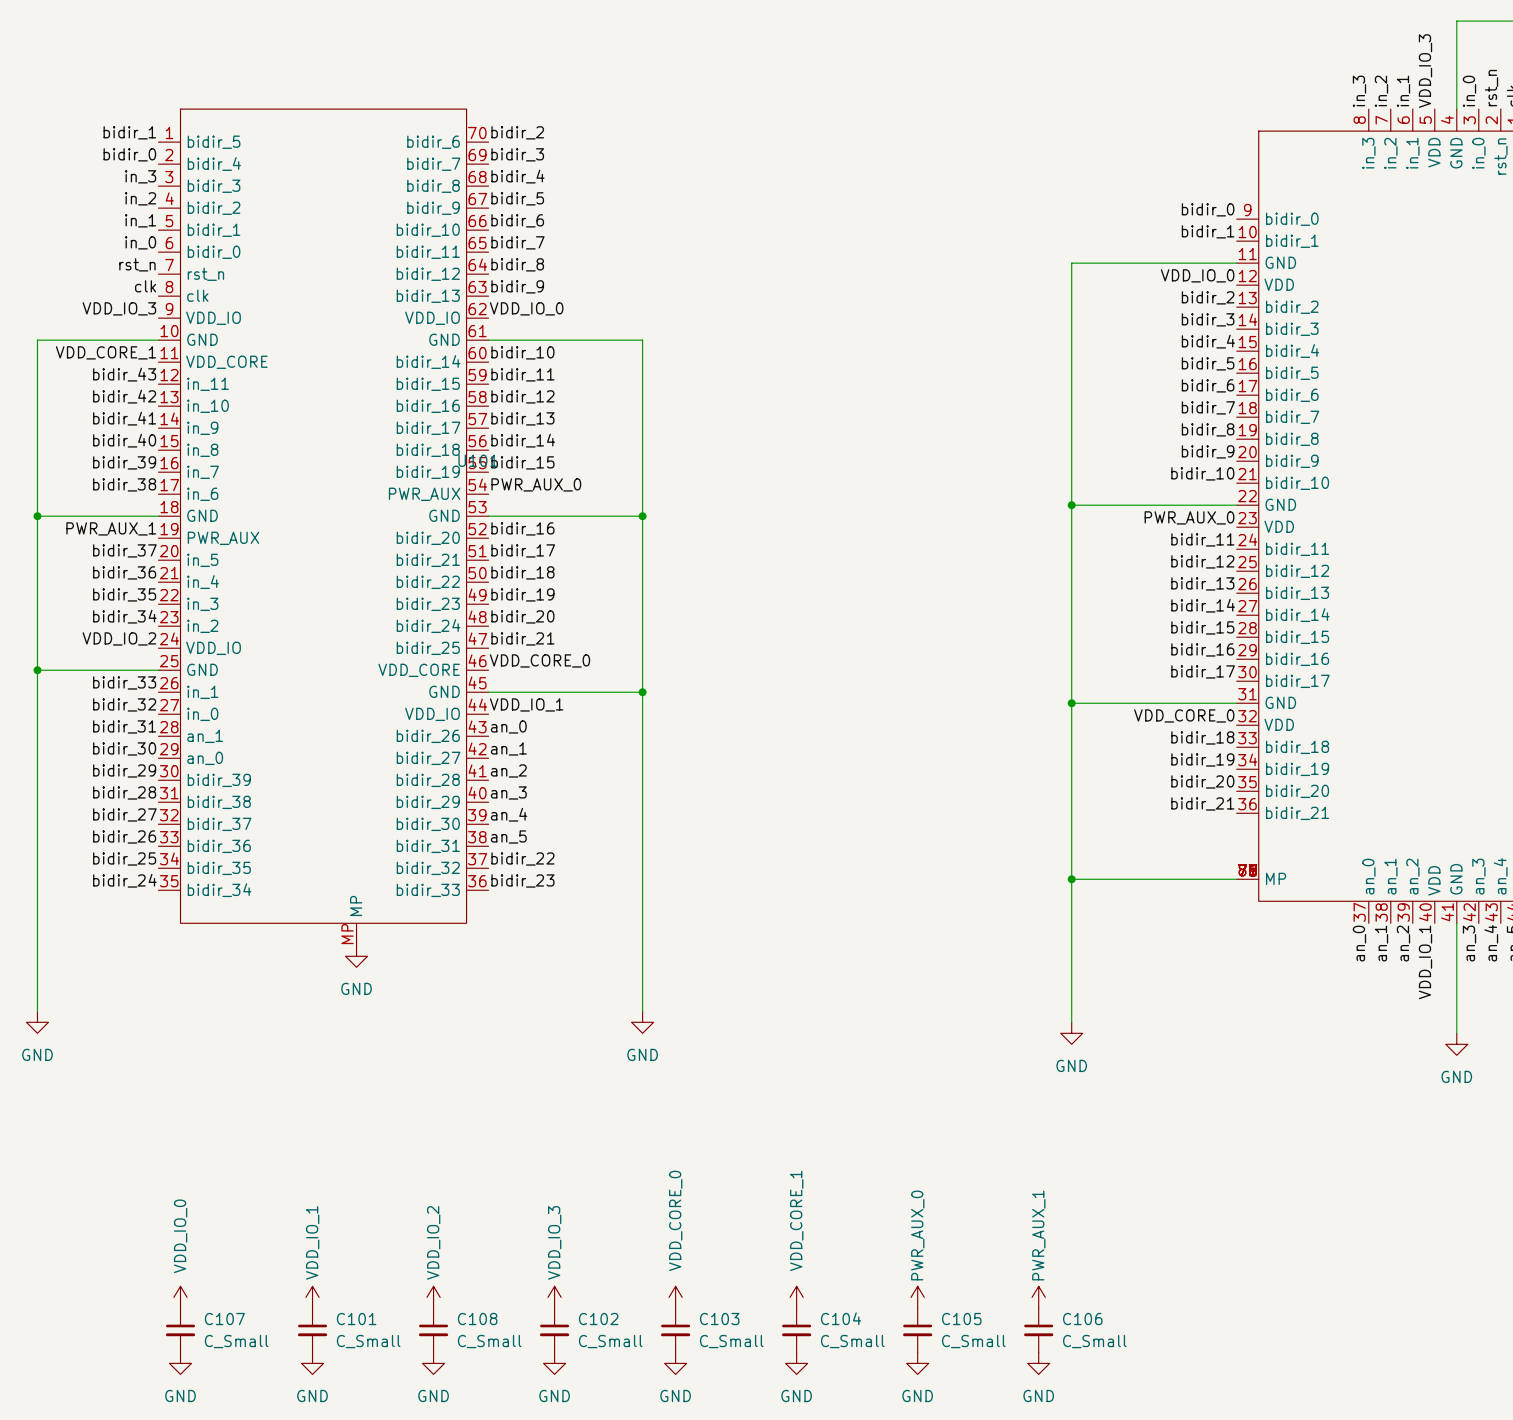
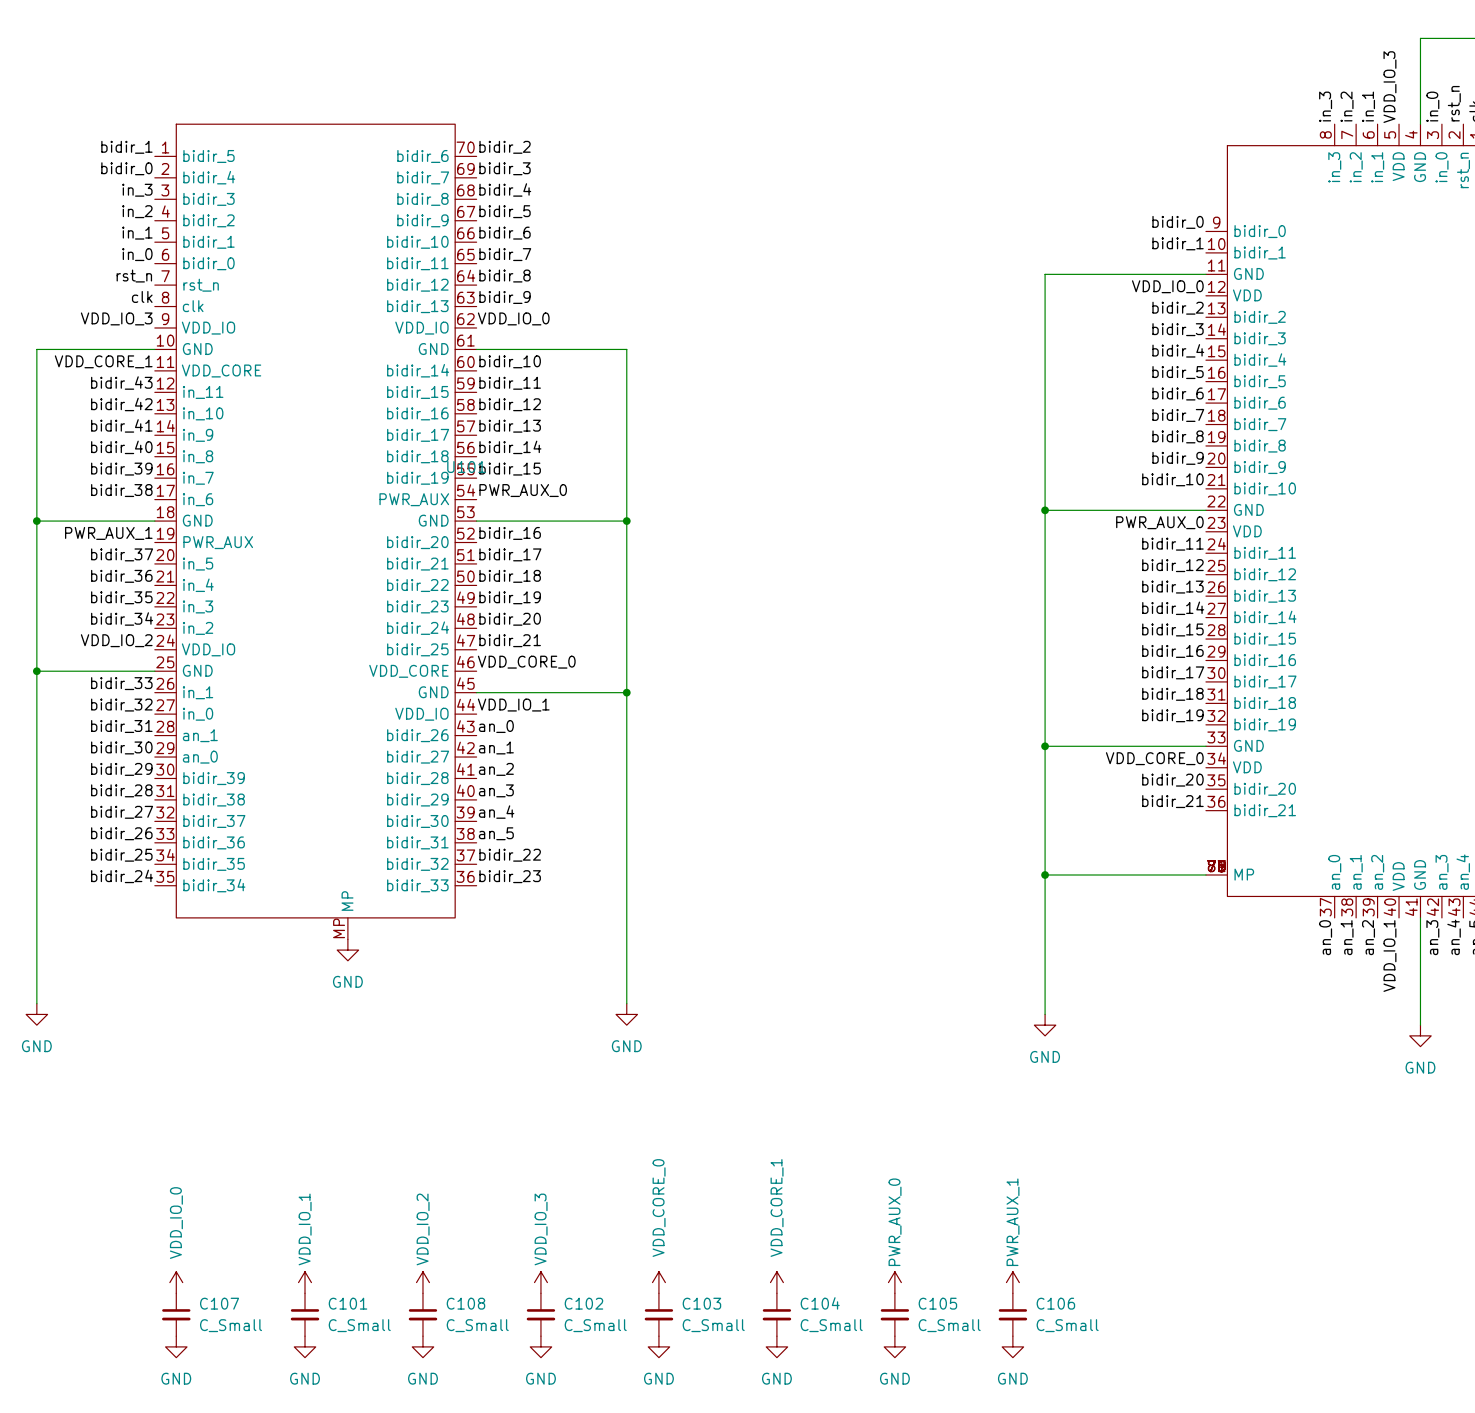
part pin name: GND (1280, 702) -> bidir_18 (1265, 703)
wire: (1071, 703) (1236, 703) -> (1045, 746) (1205, 746)
junction position: (1071, 703) -> (1045, 746)
label: VDD_CORE_0 (1184, 715) -> bidir_19 (1172, 715)
part pin name: VDD (1279, 724) -> bidir_19 (1265, 724)
label position: bidir_18 (1202, 737) -> bidir_18 (1172, 694)
part pin name: bidir_18 (1297, 747) -> GND (1248, 745)
label: bidir_19 (1202, 759) -> VDD_CORE_0 (1154, 758)
part pin name: bidir_19 (1297, 769) -> VDD (1247, 767)

